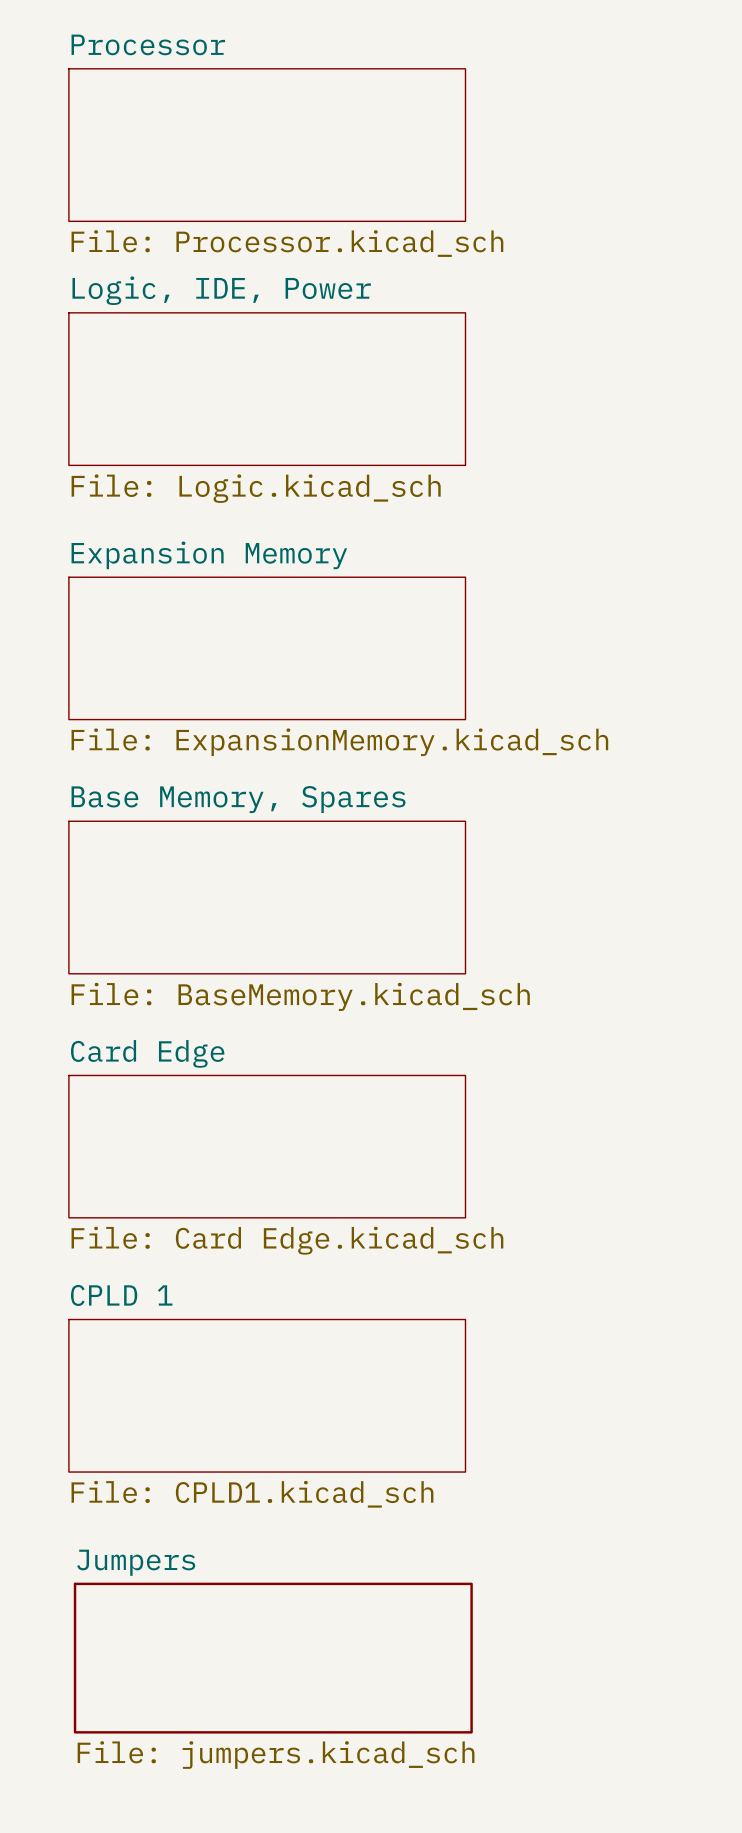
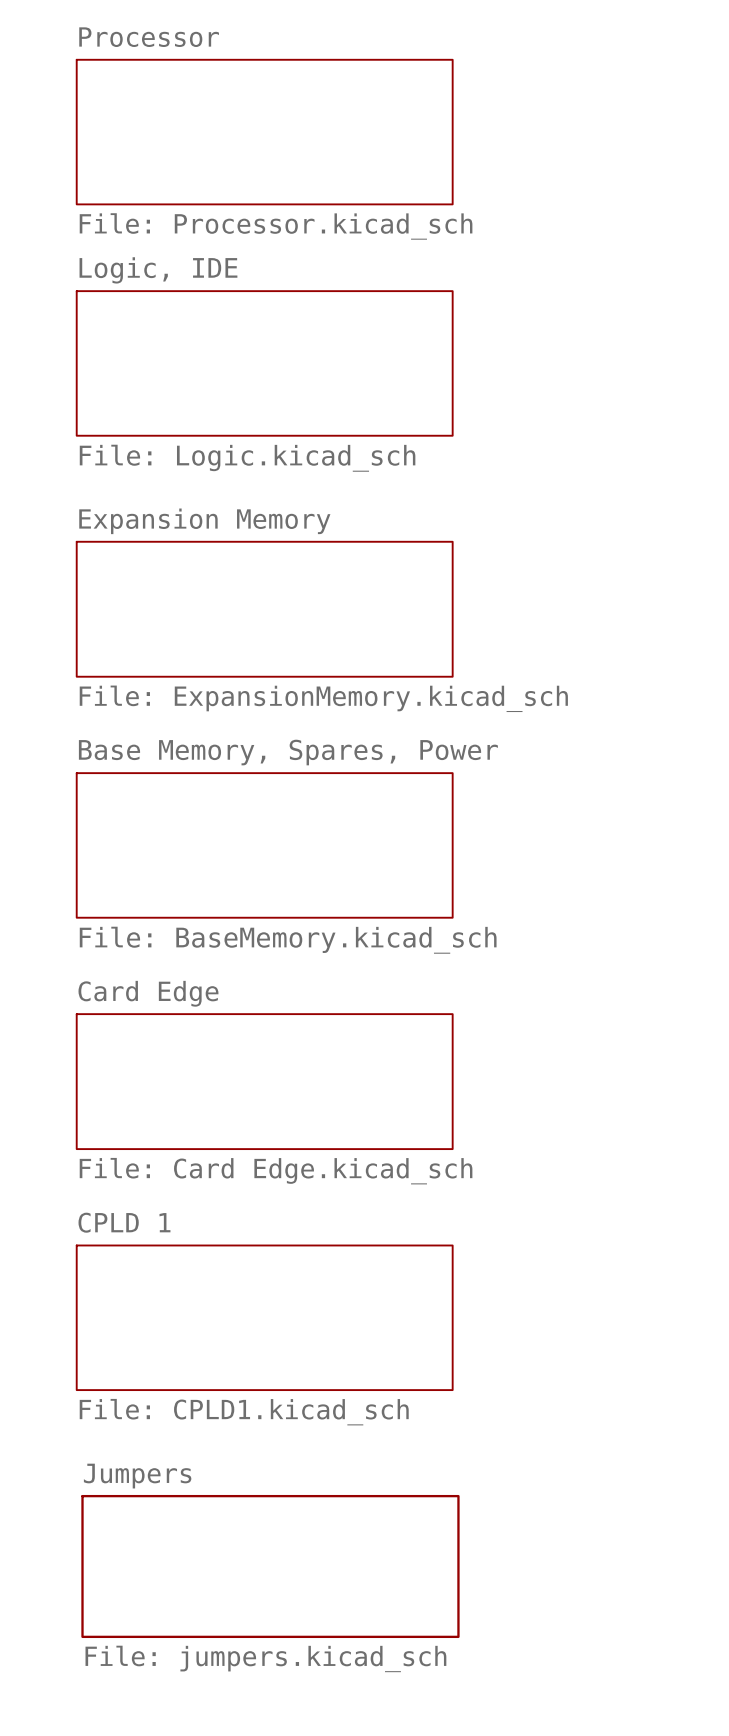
sheet Logic, IDE, Power name: Logic, IDE, Power (221, 290) -> Logic, IDE (158, 270)
sheet Base Memory, Spares name: Base Memory, Spares (238, 799) -> Base Memory, Spares, Power (288, 752)

